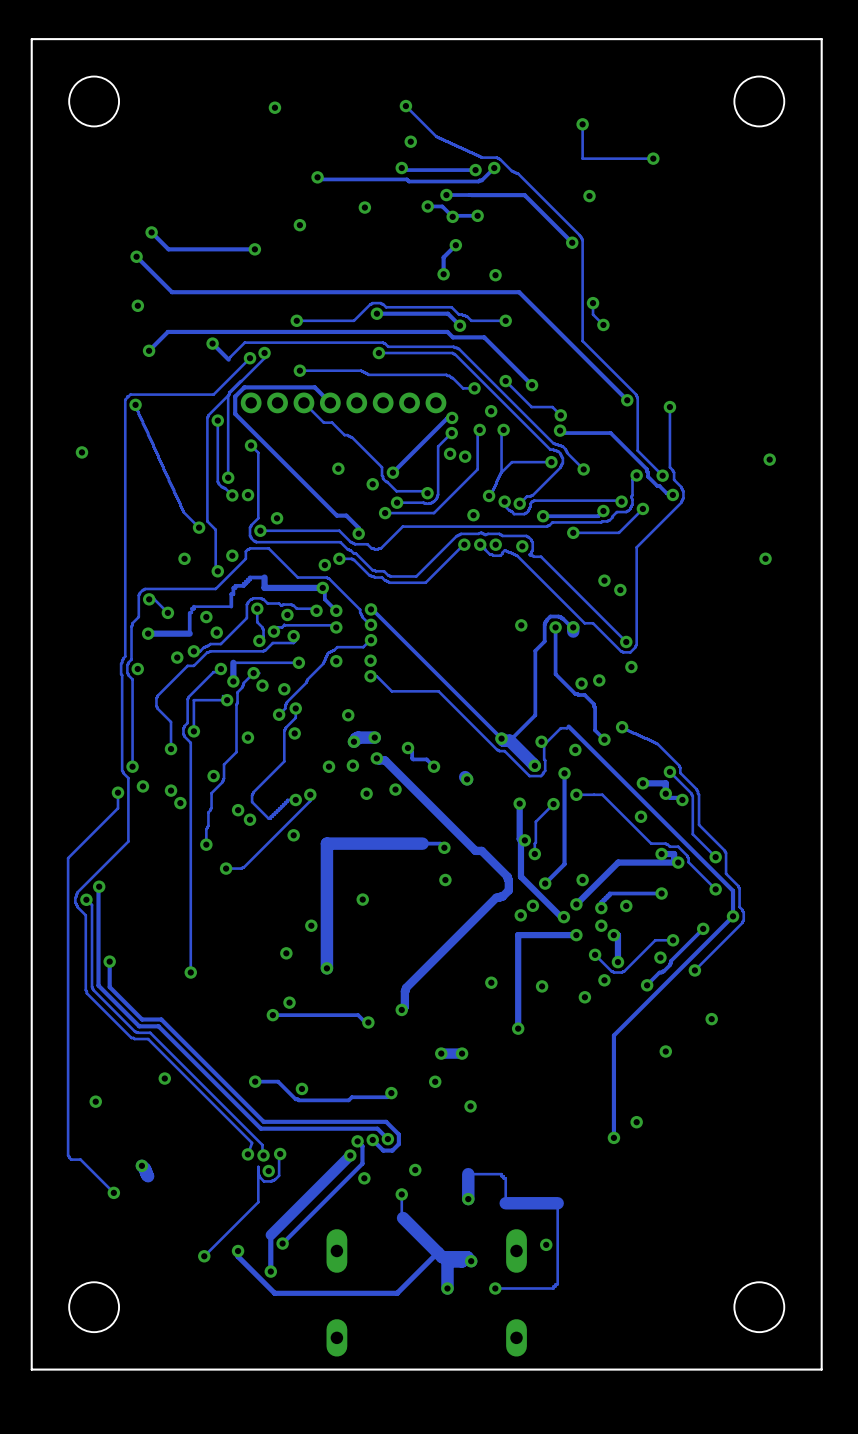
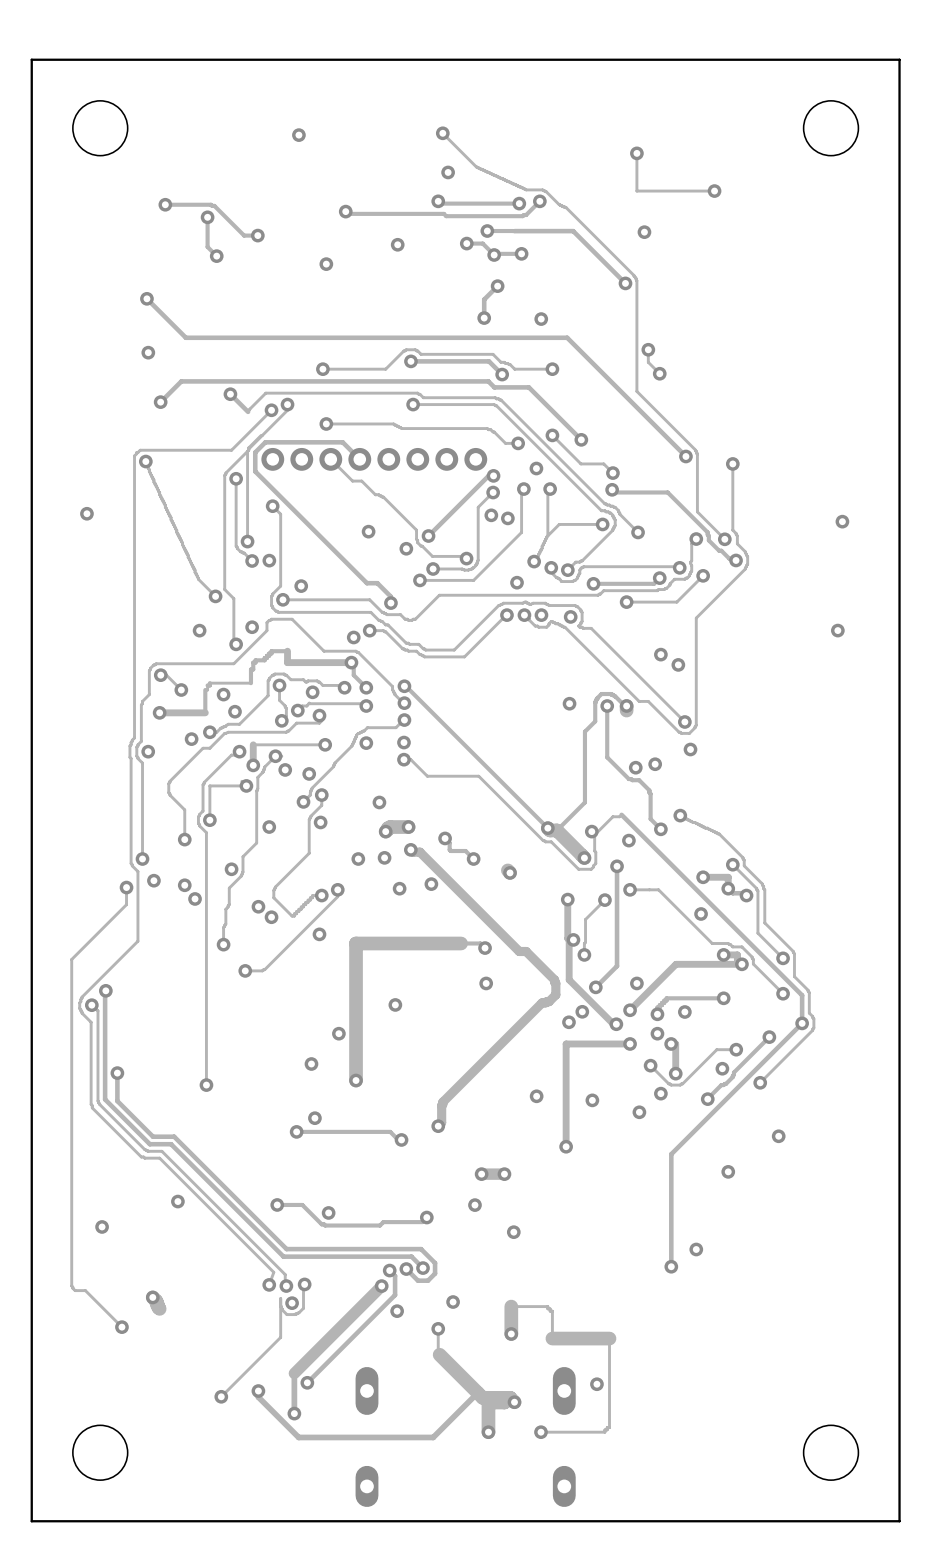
track: none -> (165, 204) (211, 204) (244, 235) (257, 235)
via: none -> (165, 204)
track: none -> (207, 217) (207, 247) (216, 256)
via: none -> (207, 217)
via: none -> (257, 235)
via: none -> (216, 256)
track: (151, 232) (168, 249) (254, 249) -> none
via: (151, 232) -> none
via: (254, 249) -> none

